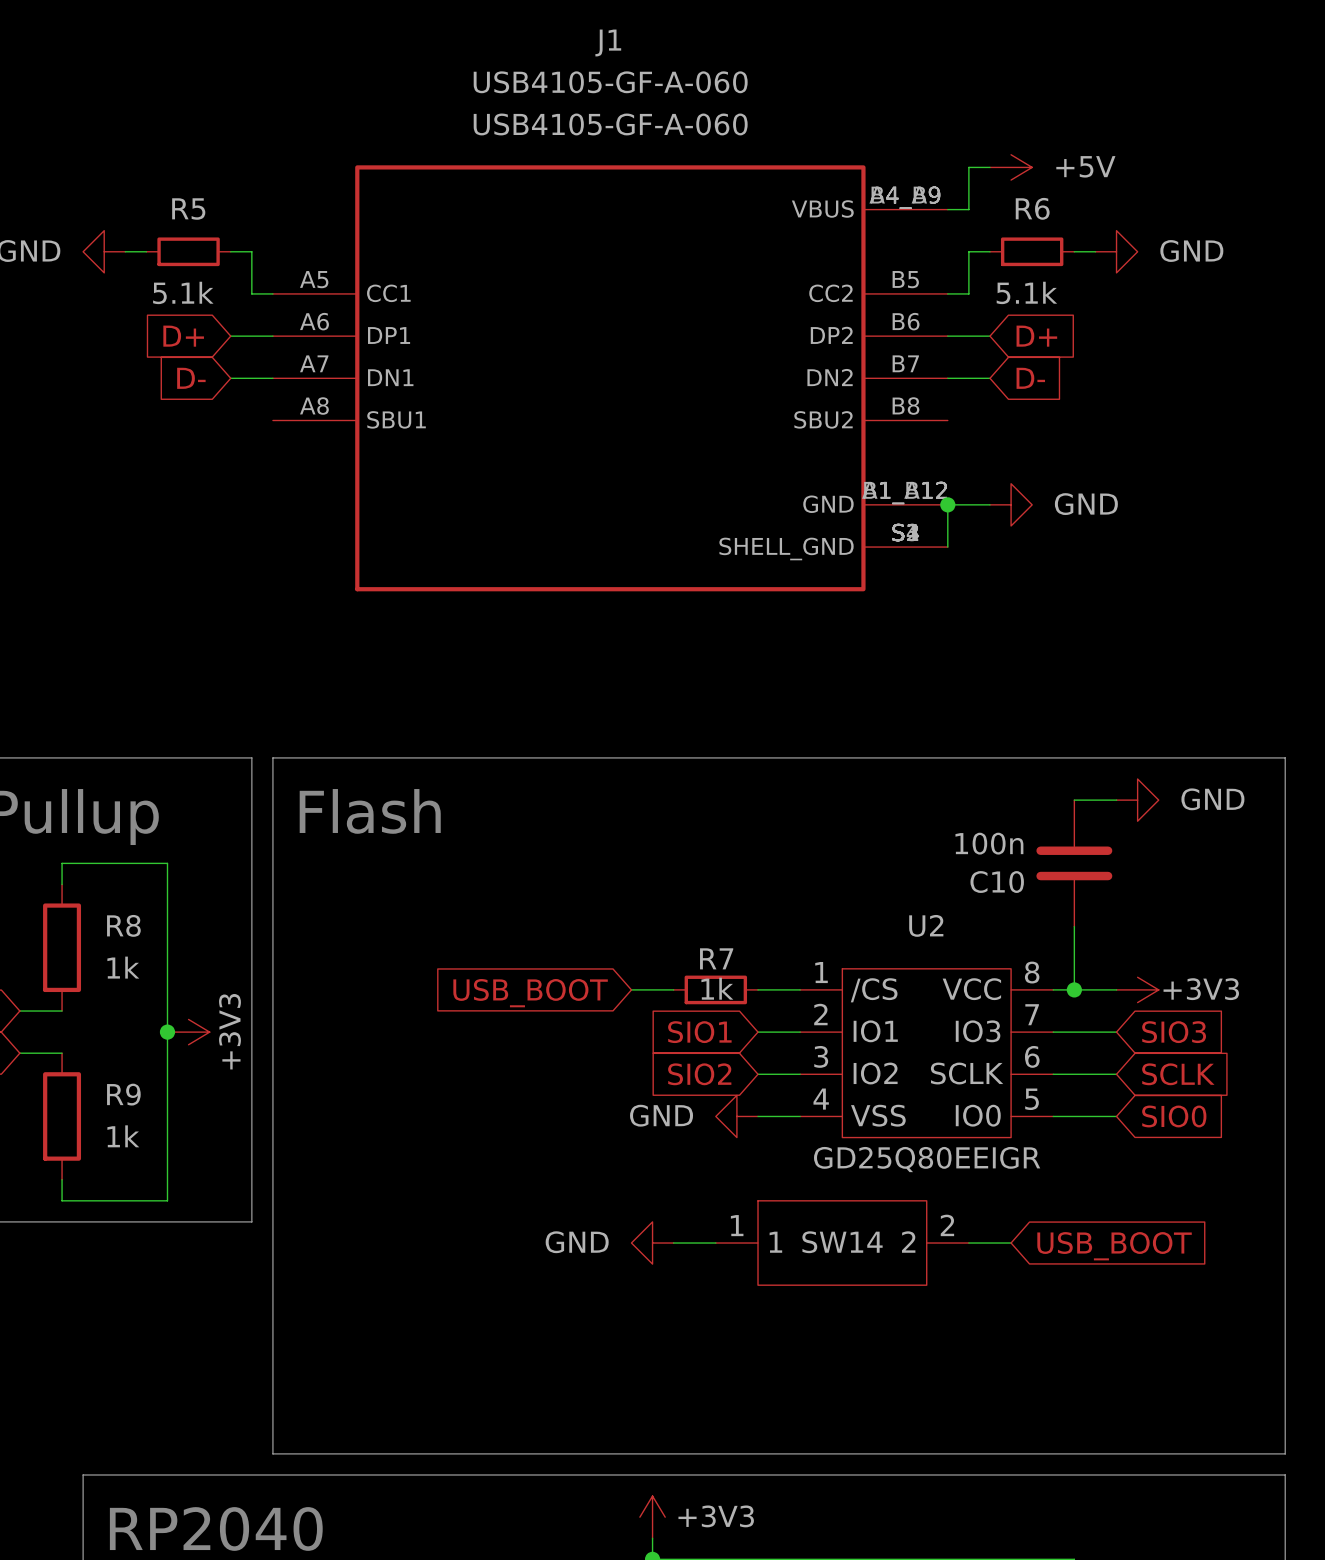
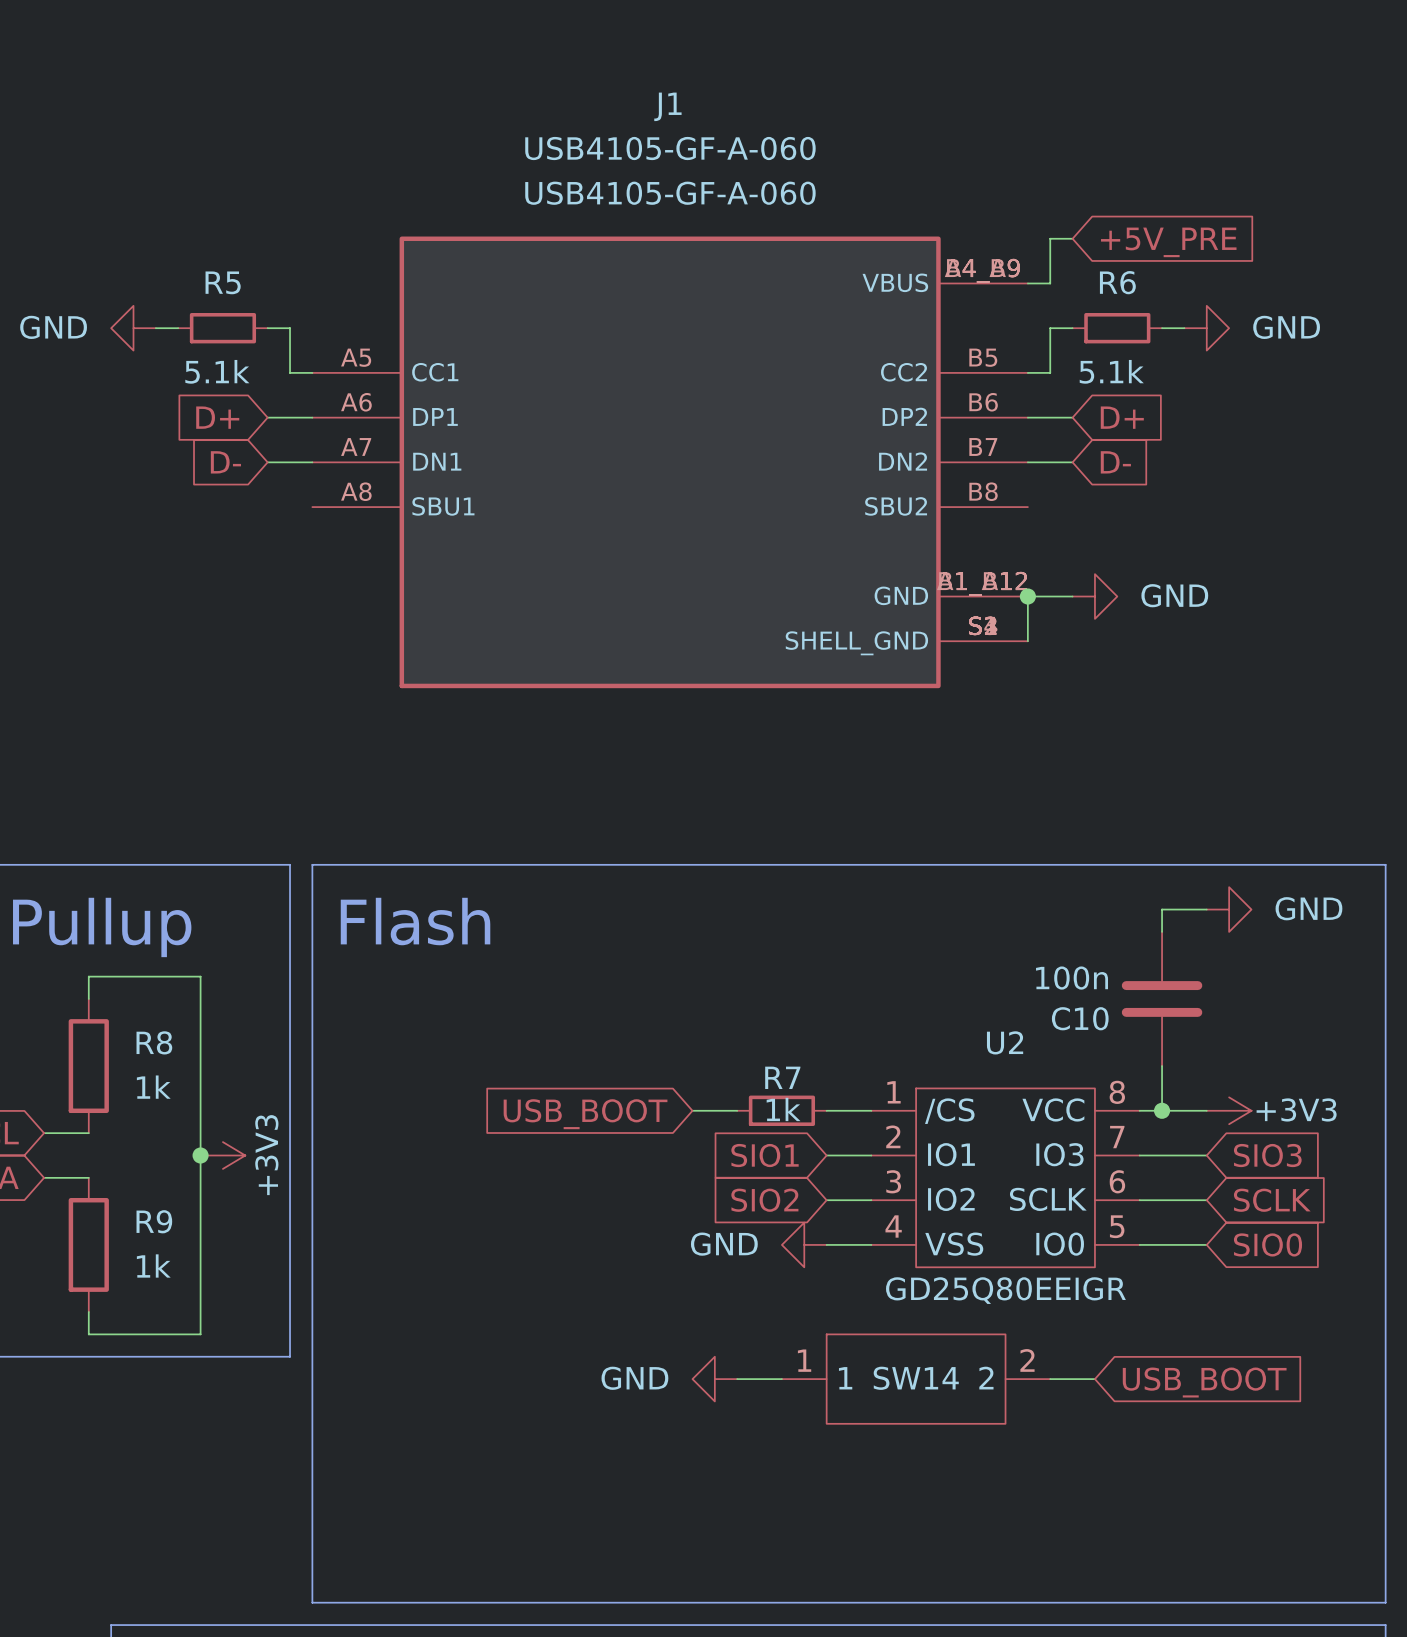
power symbol: +5V (1011, 167) -> none
global label: none -> +5V_PRE (1168, 242)
C10 position: (1074, 863) -> (1162, 998)

